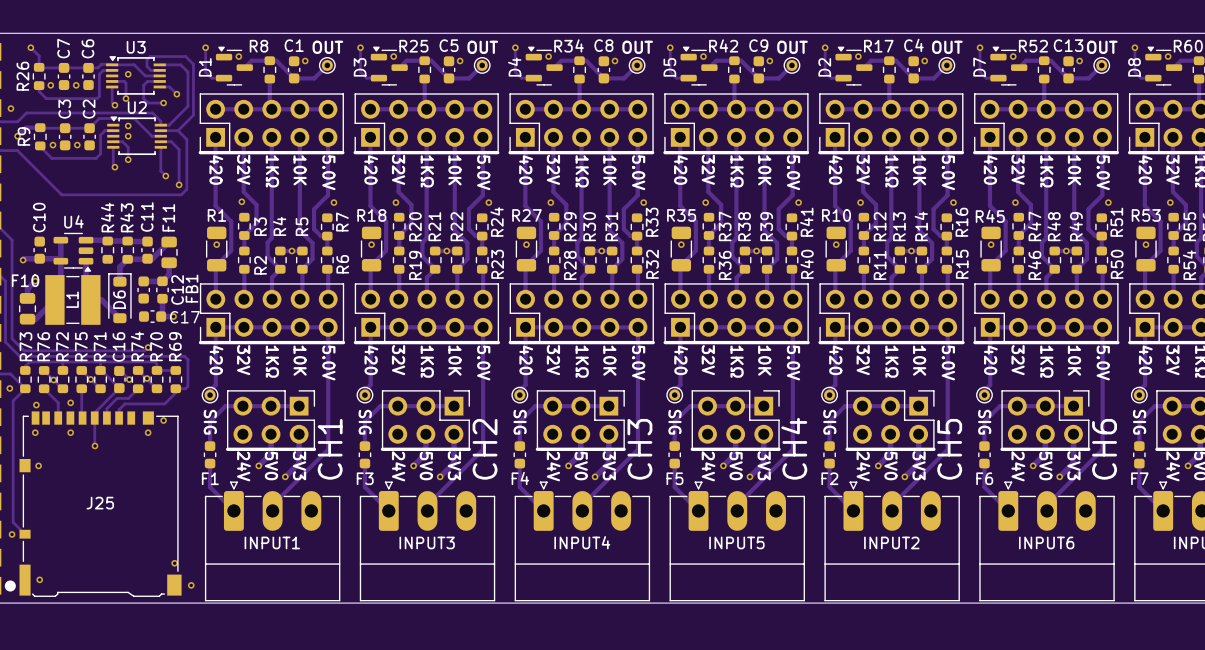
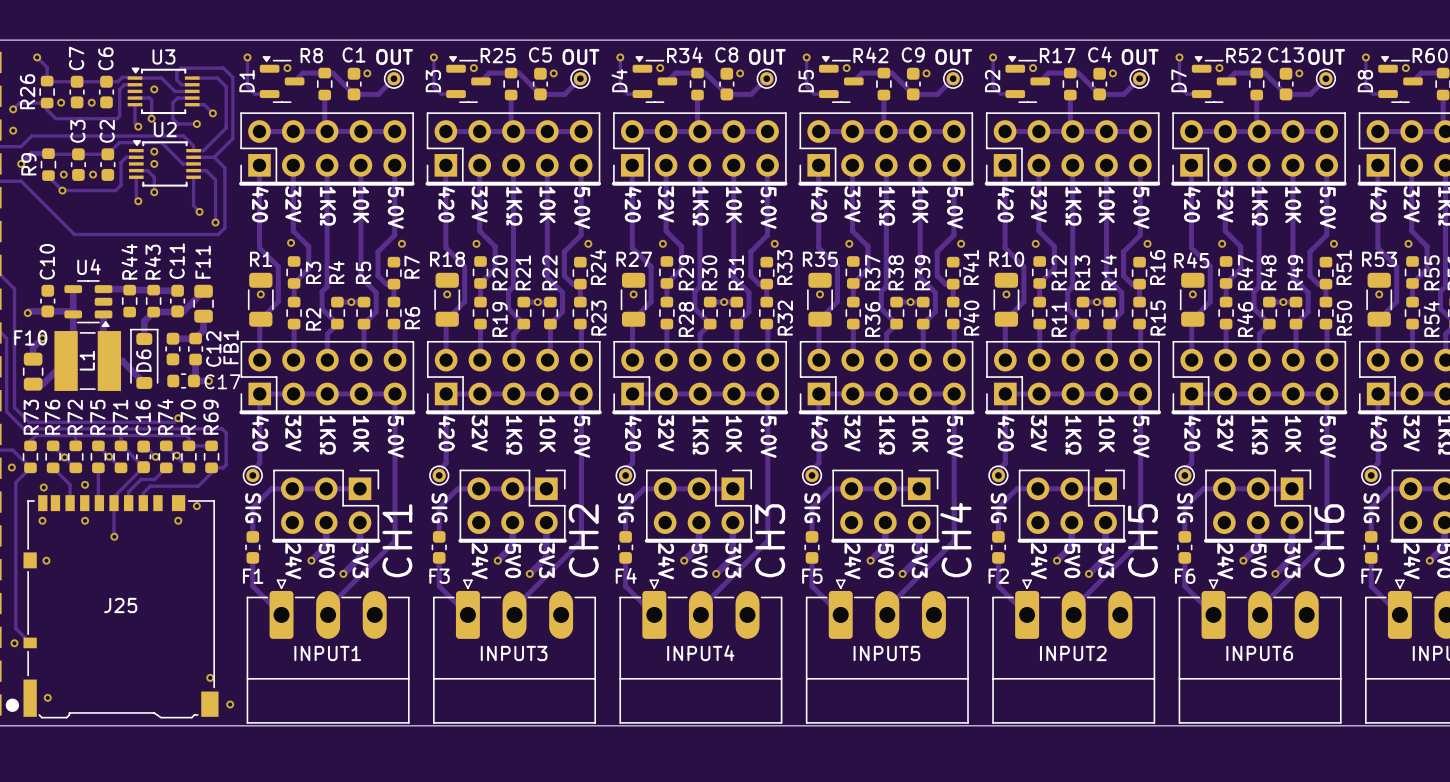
track: none -> (47, 103) (19, 103) (13, 109)
via: none -> (13, 109)
via: none -> (62, 190)

